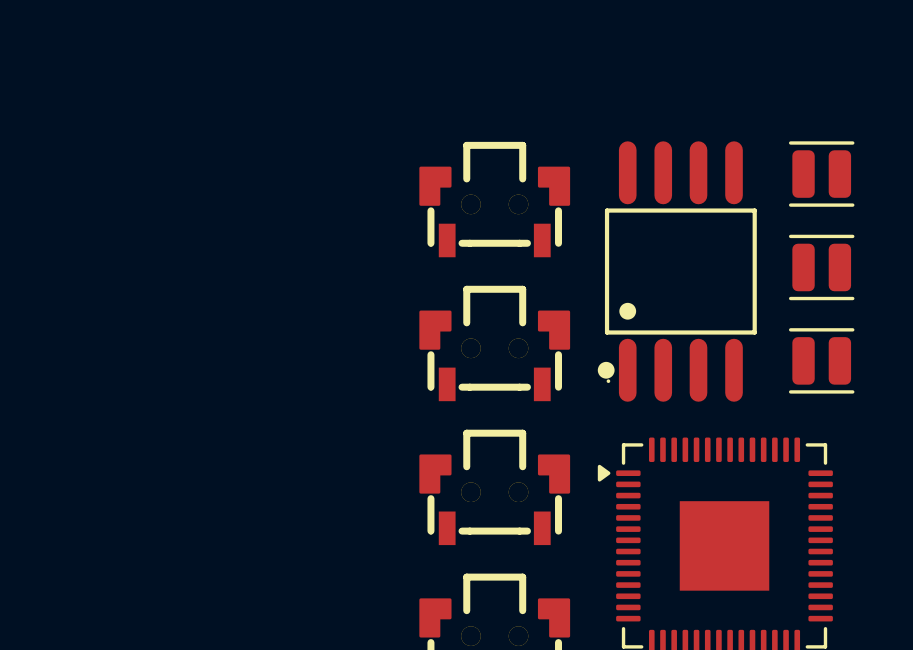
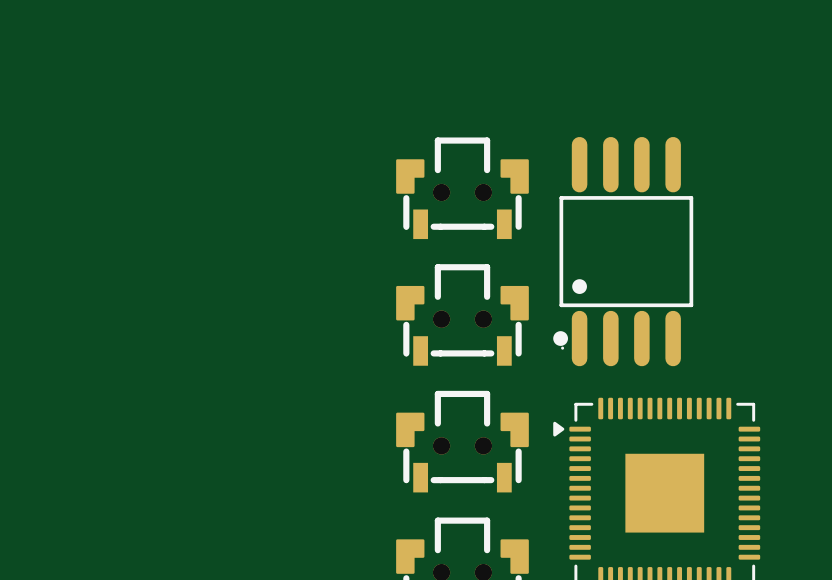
part: (821, 174) -> none
part: (821, 267) -> none
part: (821, 360) -> none

